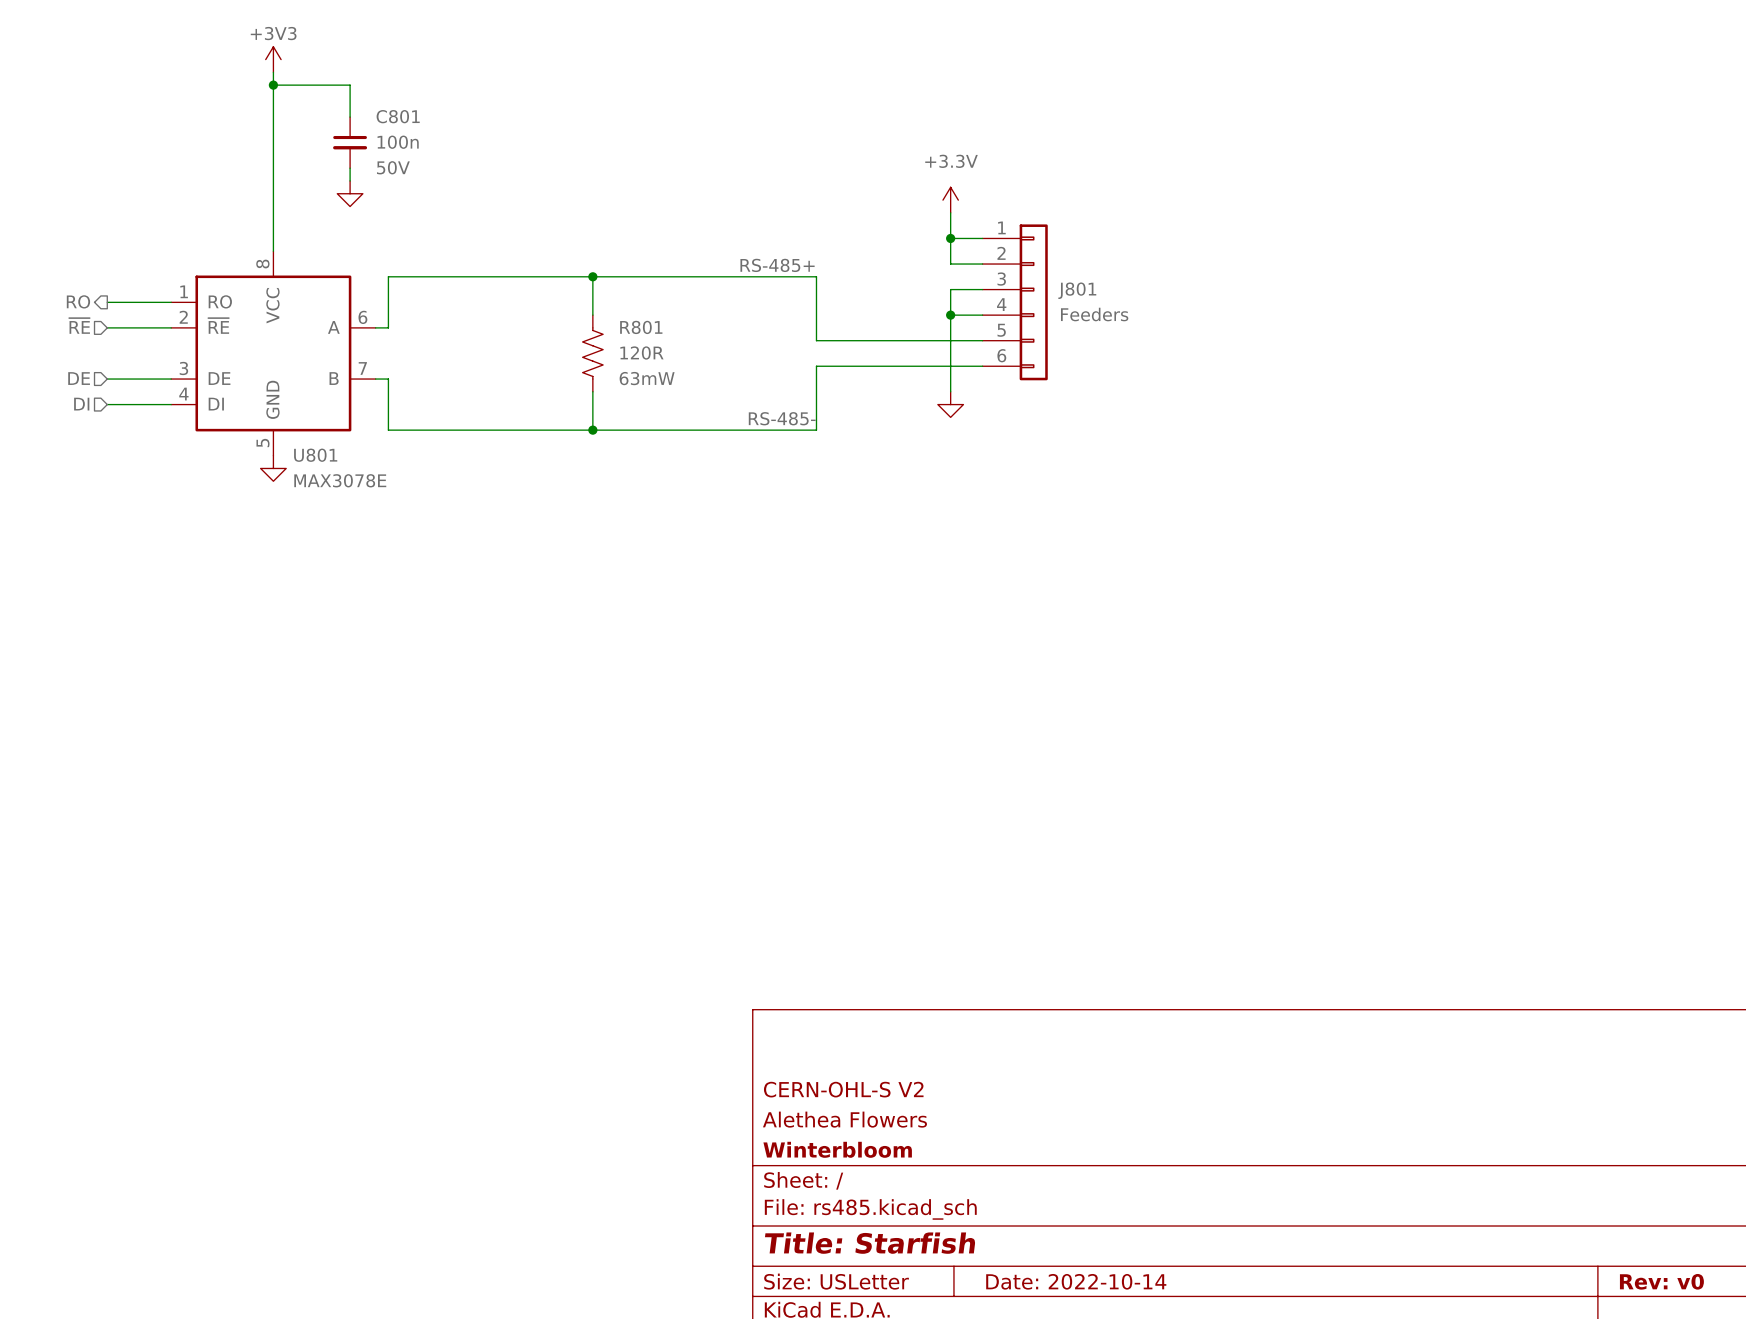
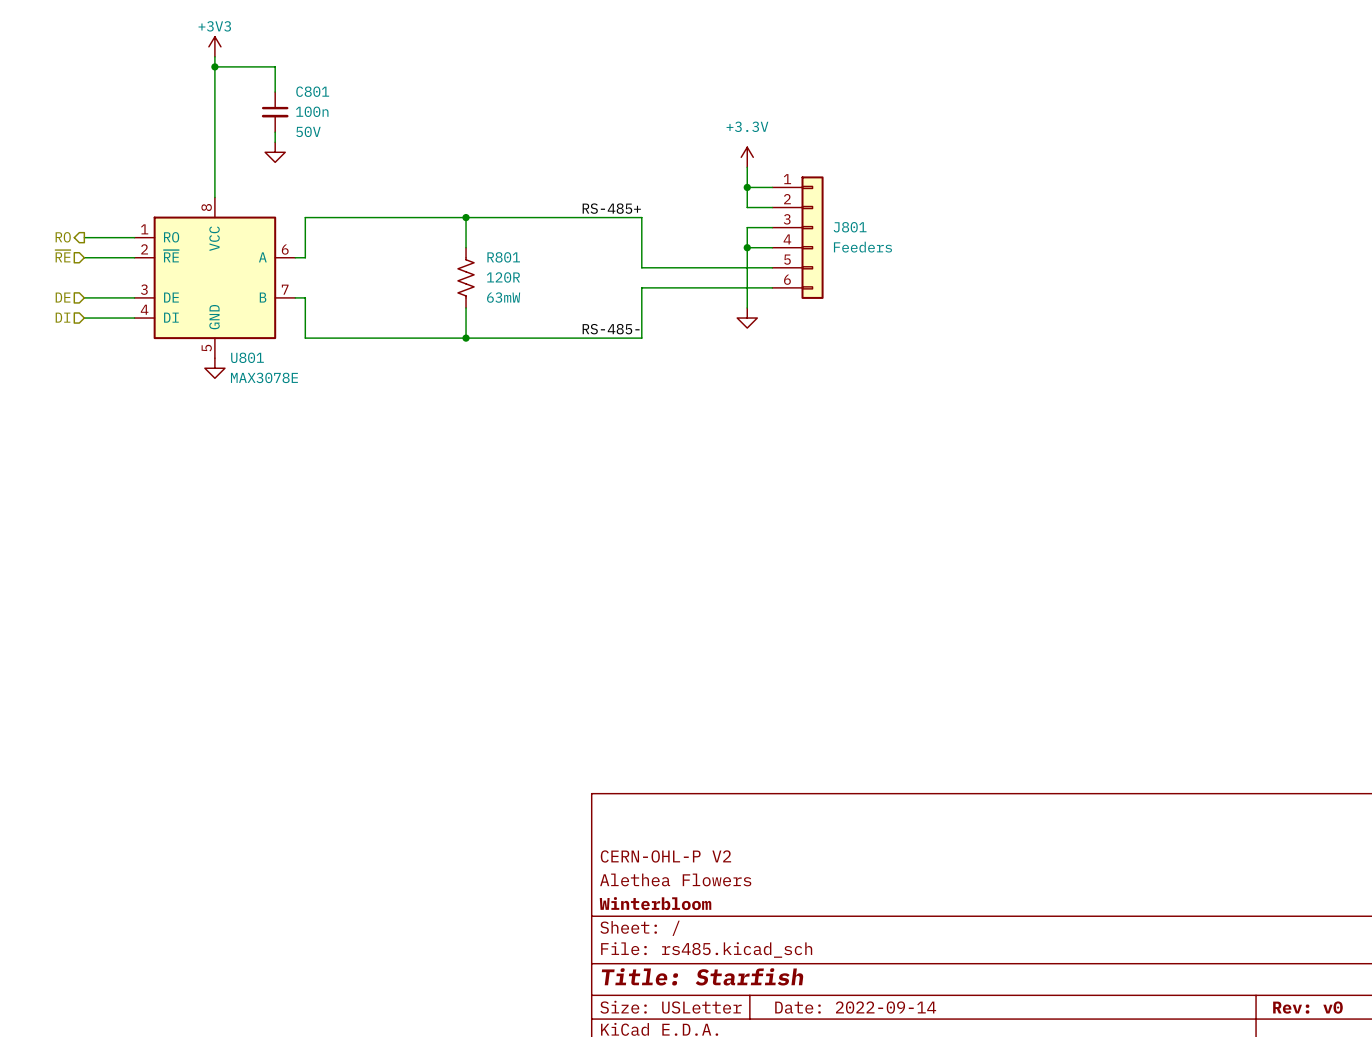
title block: CERN-OHL-S V2 (843, 1089) -> CERN-OHL-P V2 (665, 856)
title block: Date: 2022-10-14 (1076, 1281) -> Date: 2022-09-14 (855, 1007)

